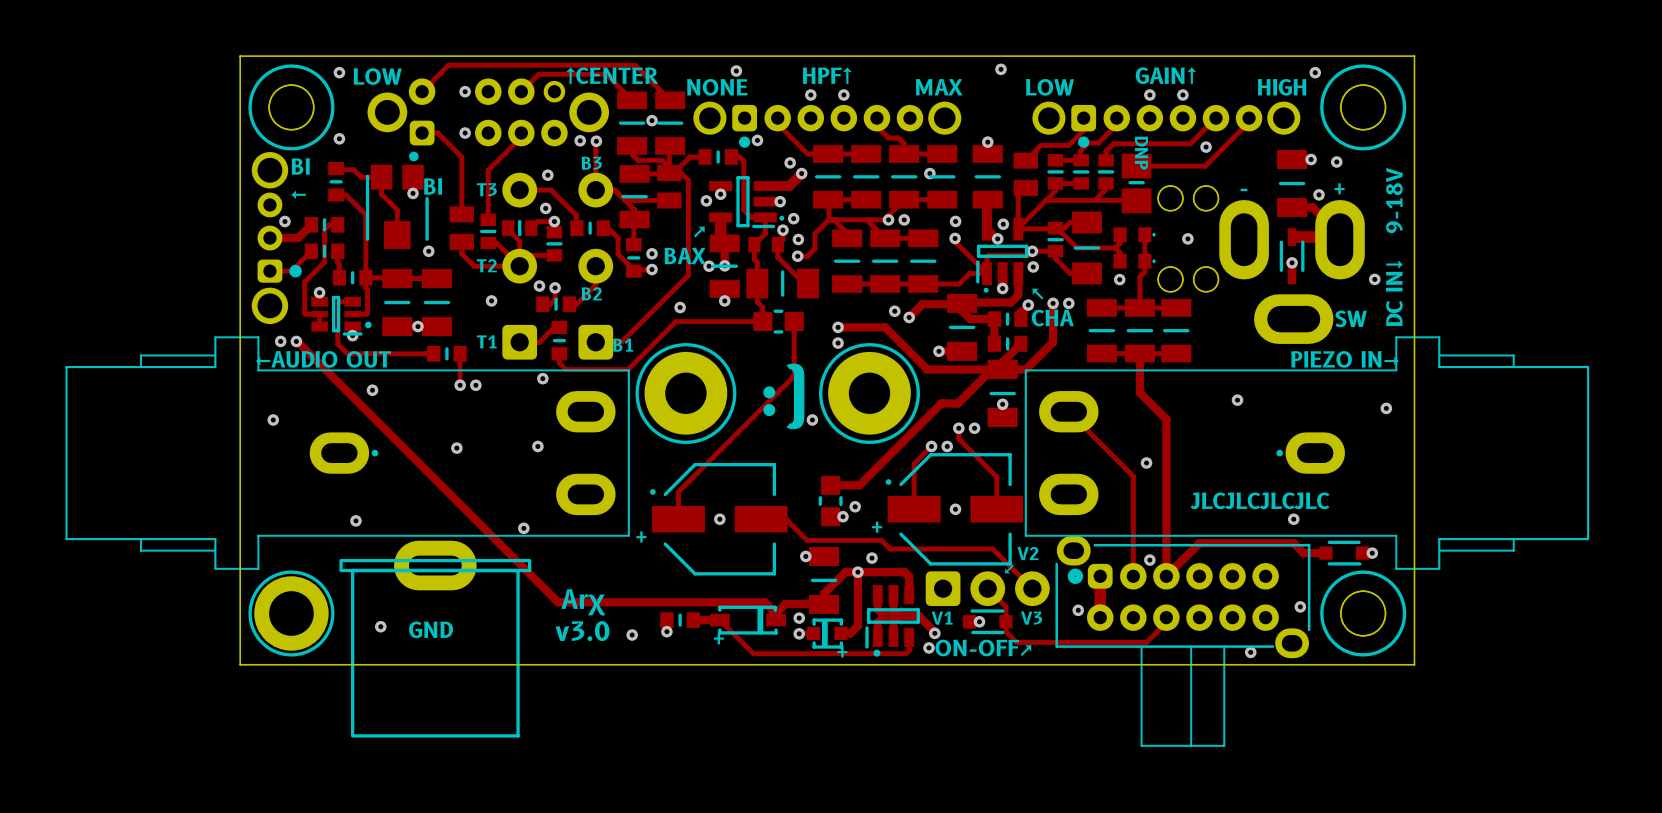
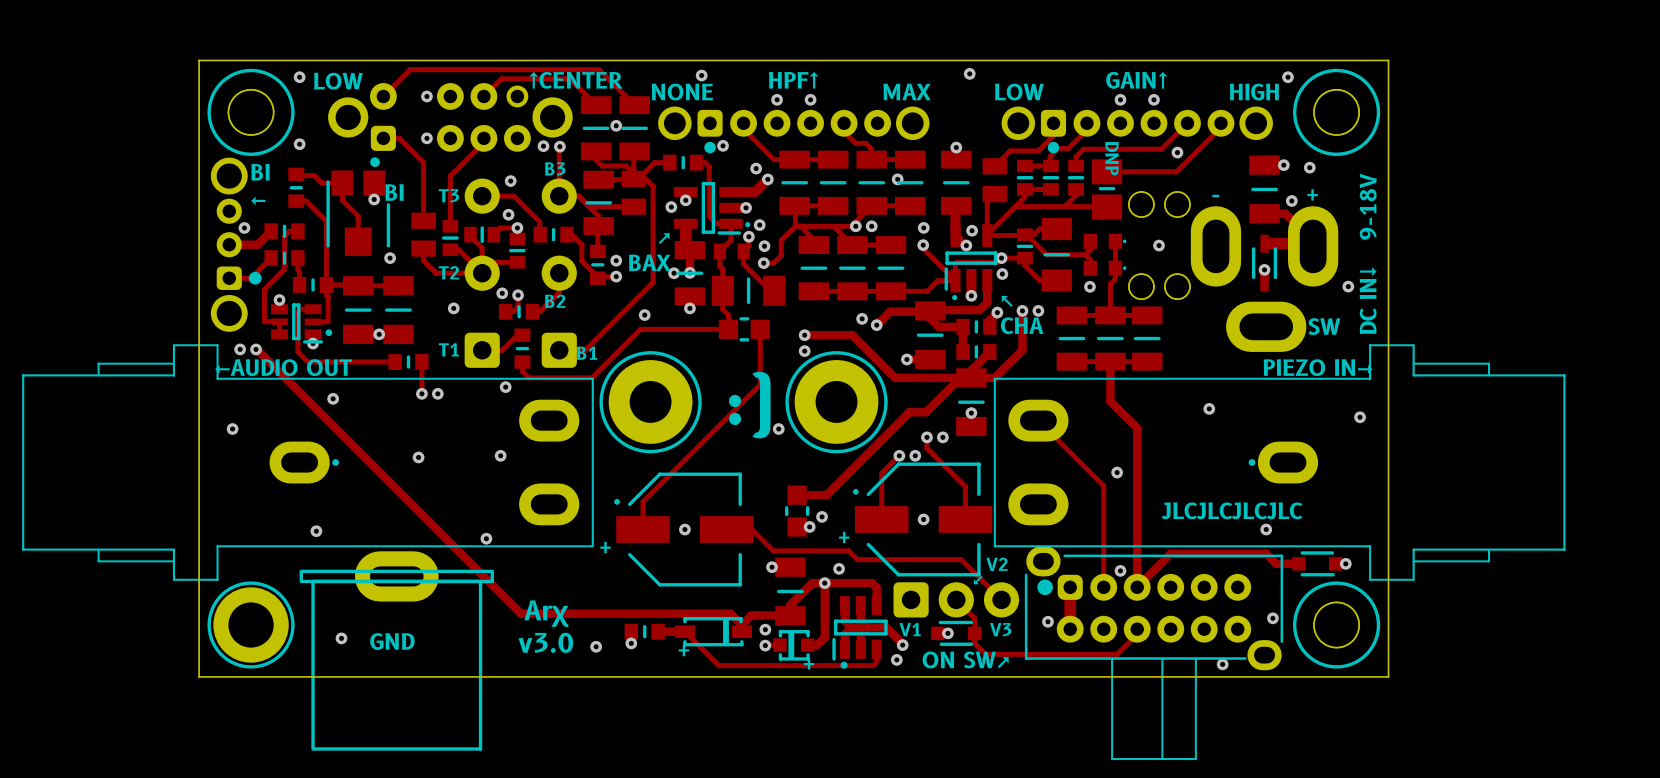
text: ON-OFF↗ (983, 647) -> none
text: none -> ON SW↗ (965, 659)

